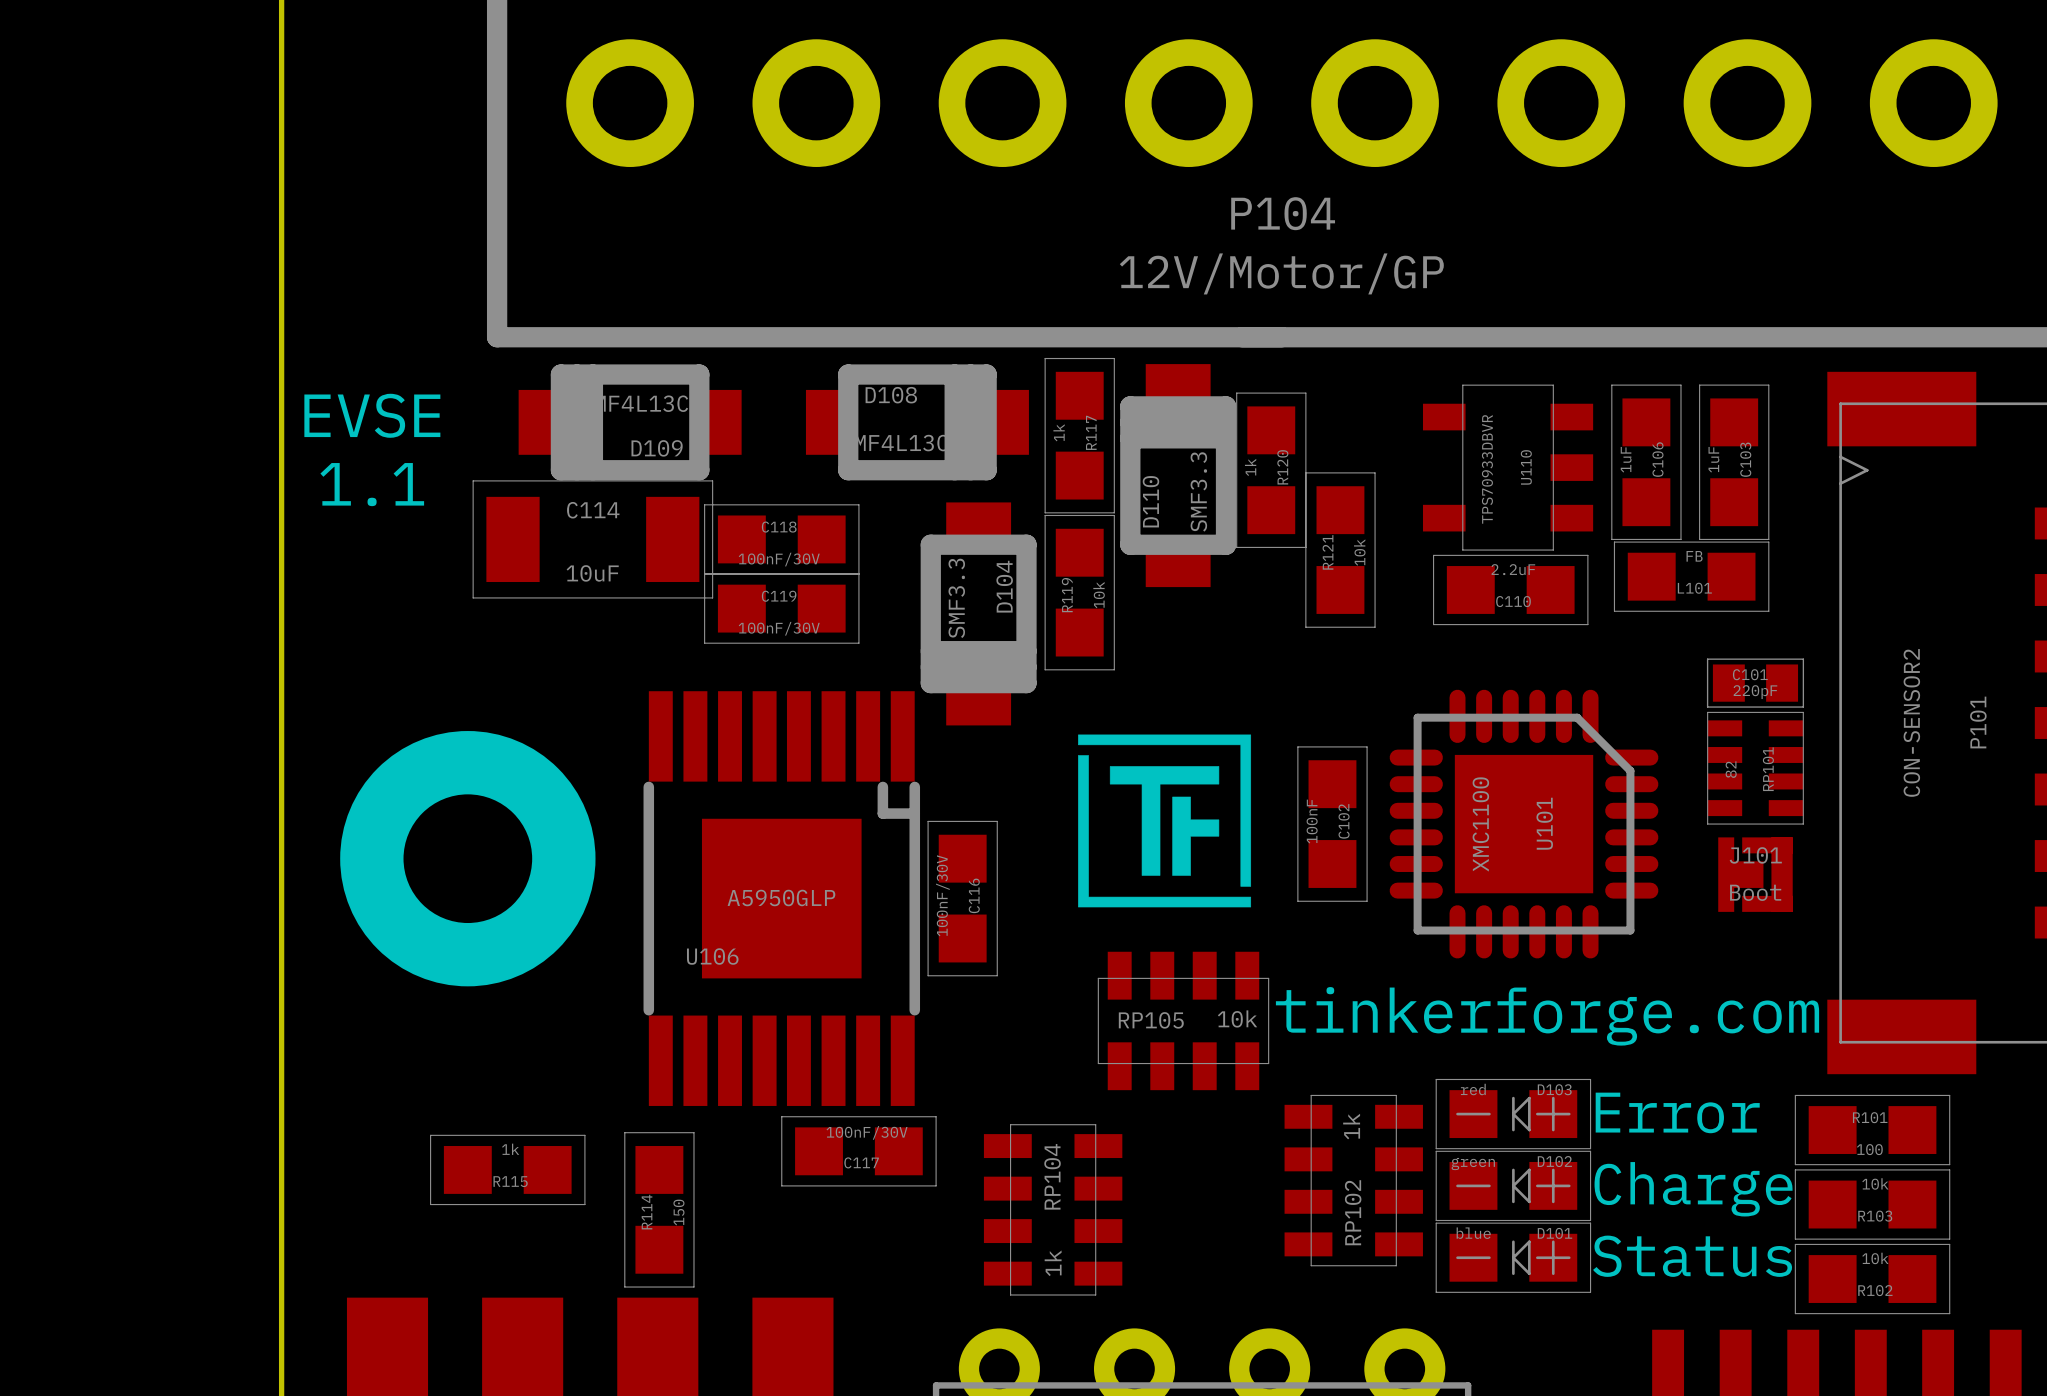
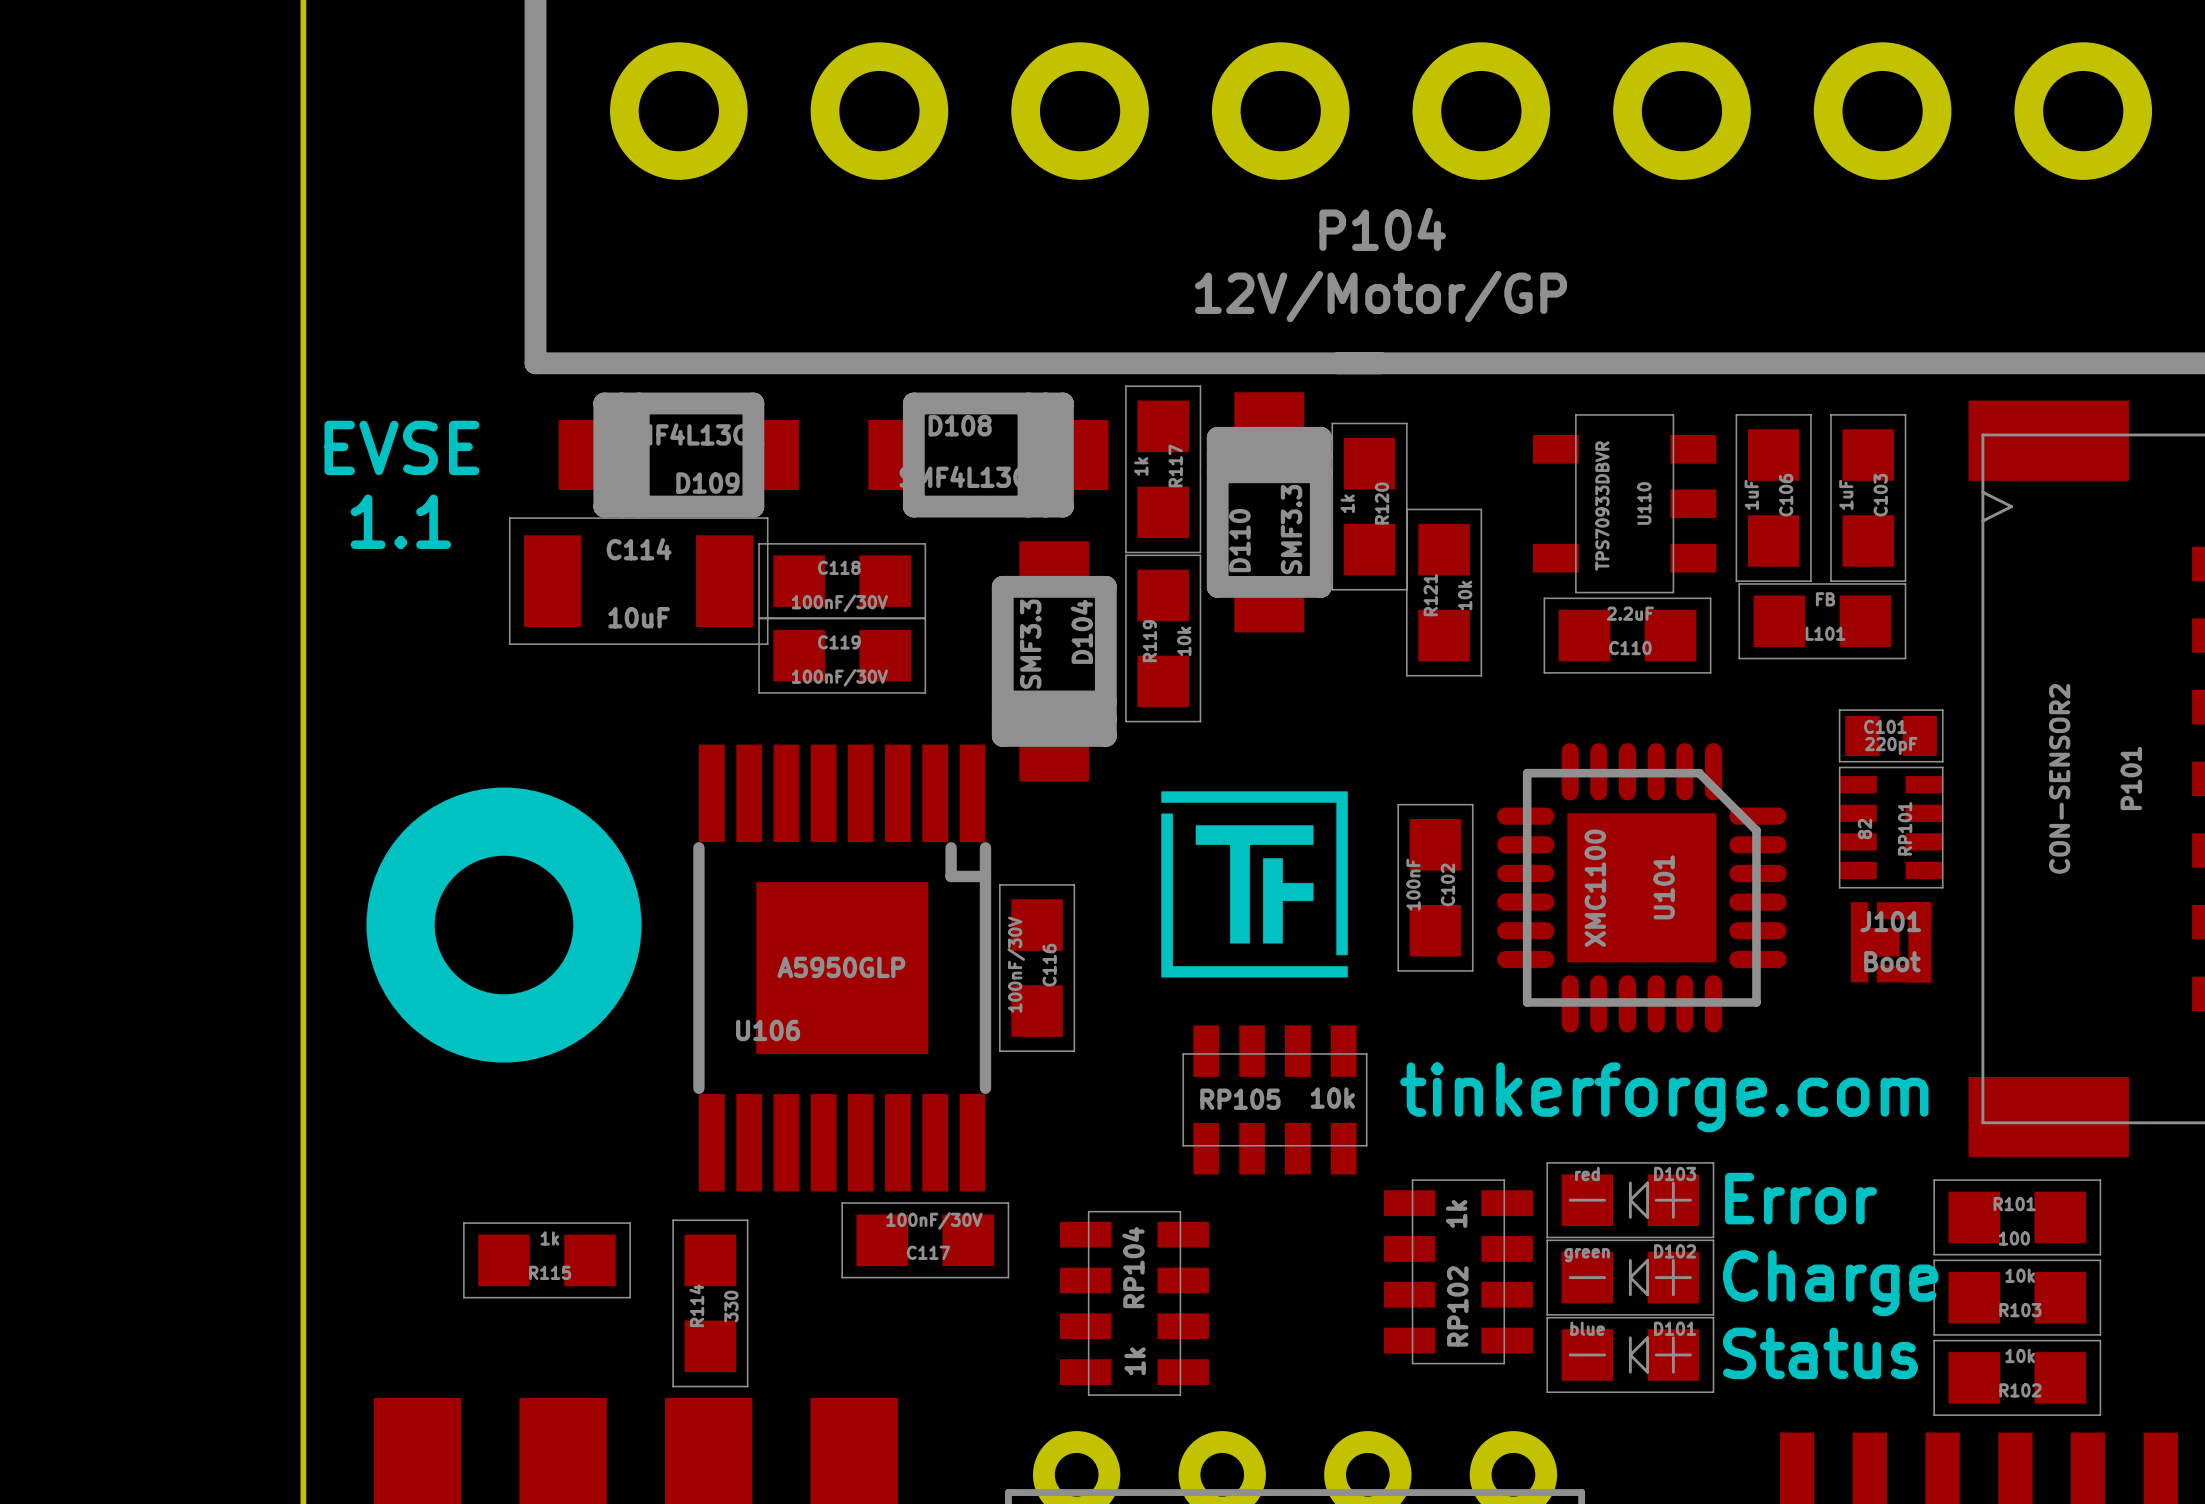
R114 value: 150 (678, 1212) -> 330 (731, 1306)

